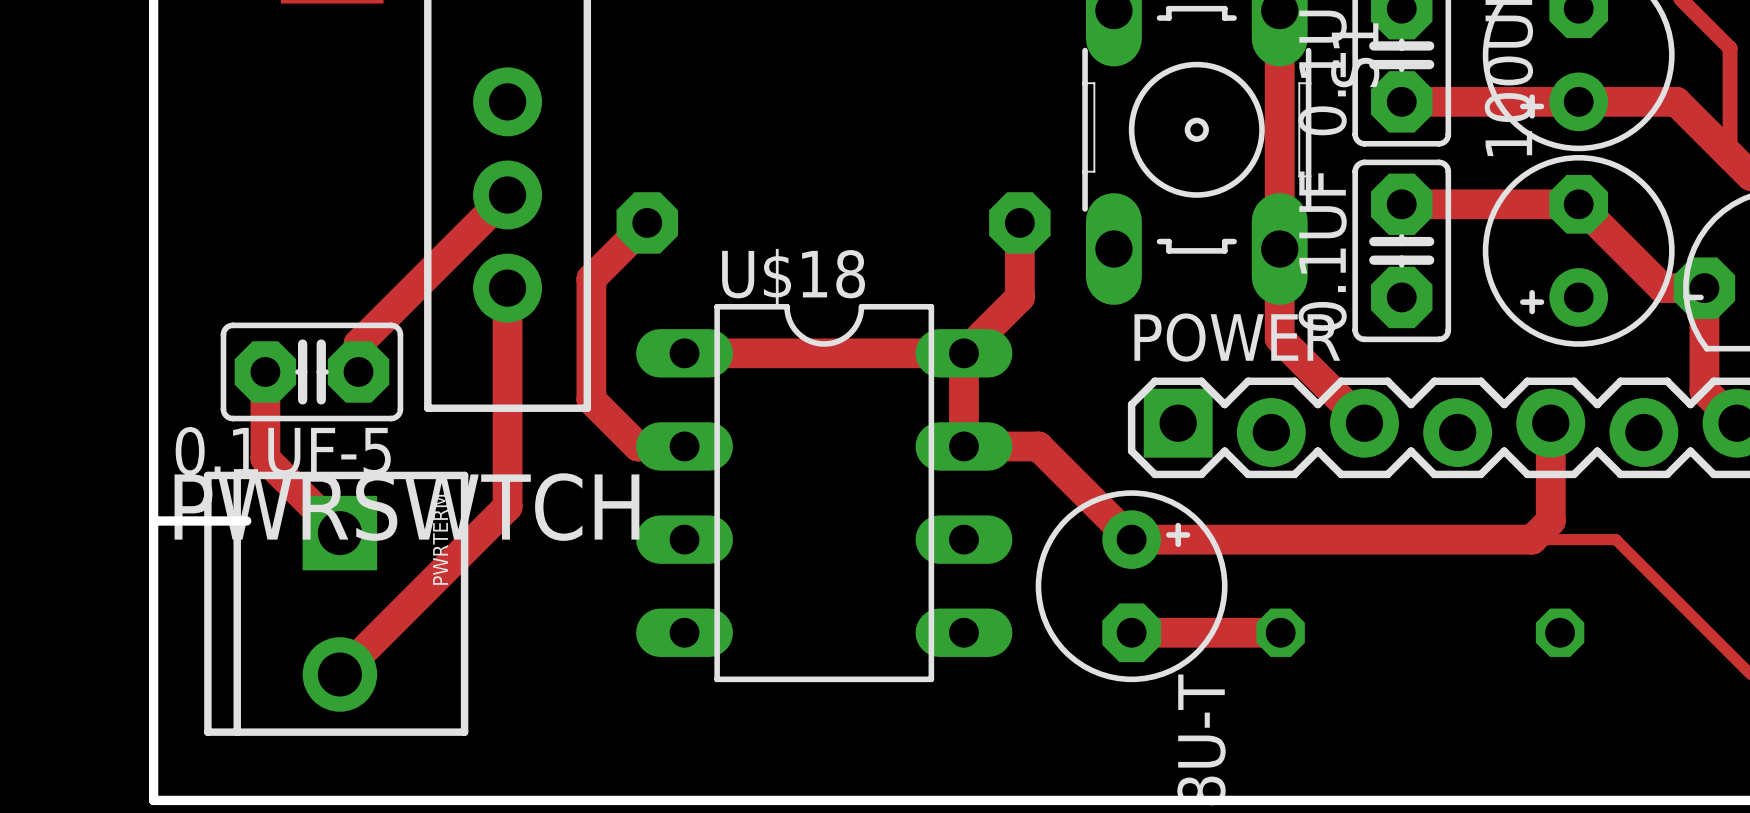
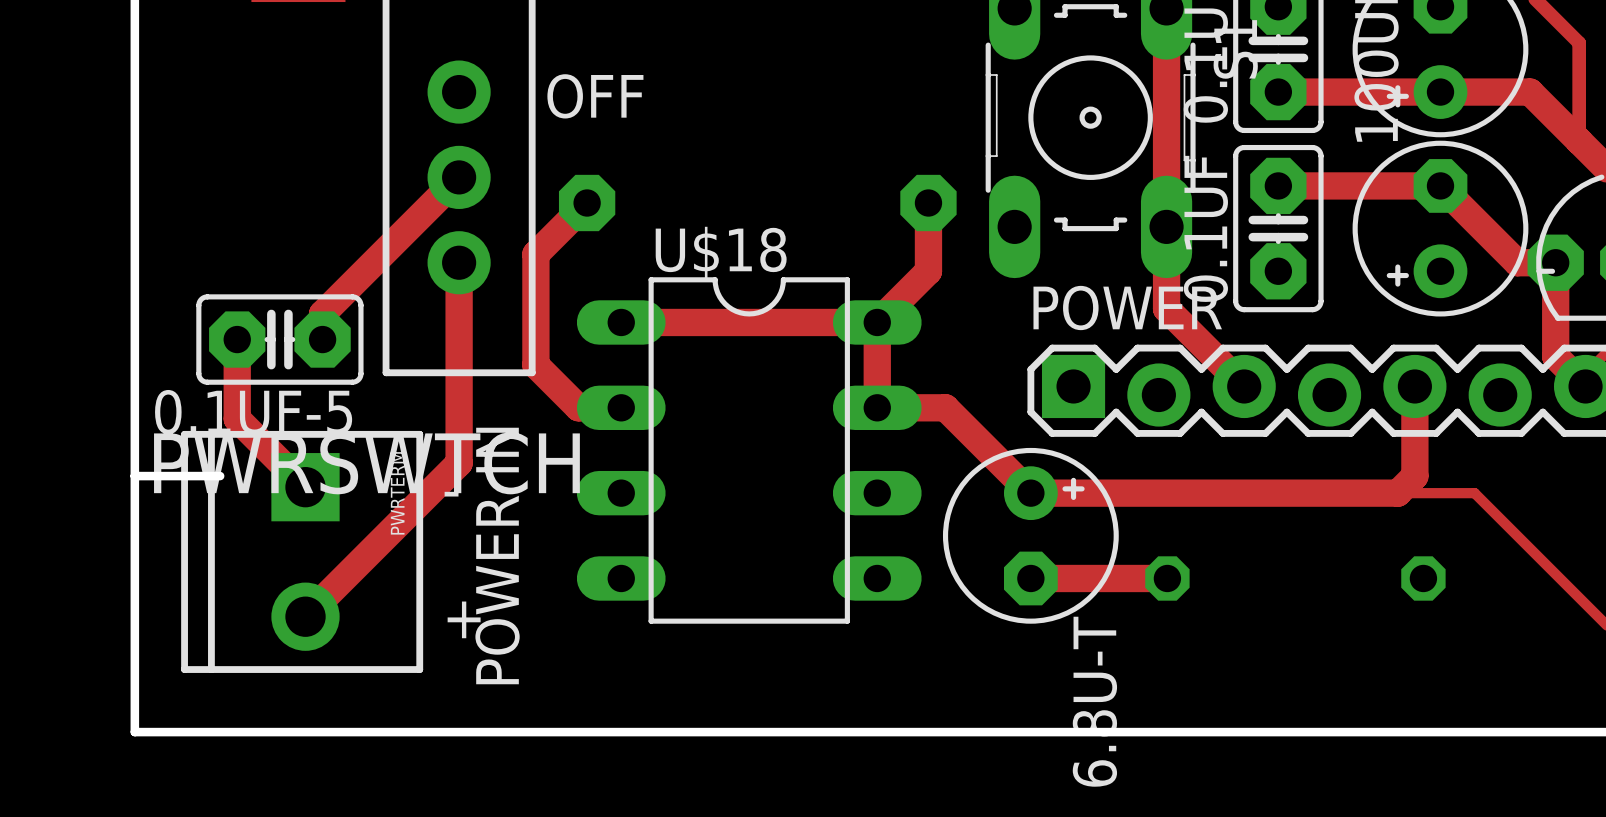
text: none -> OFF (595, 96)
text: none -> - (451, 494)
text: none -> POWER IN (497, 556)
text: none -> + (464, 619)

